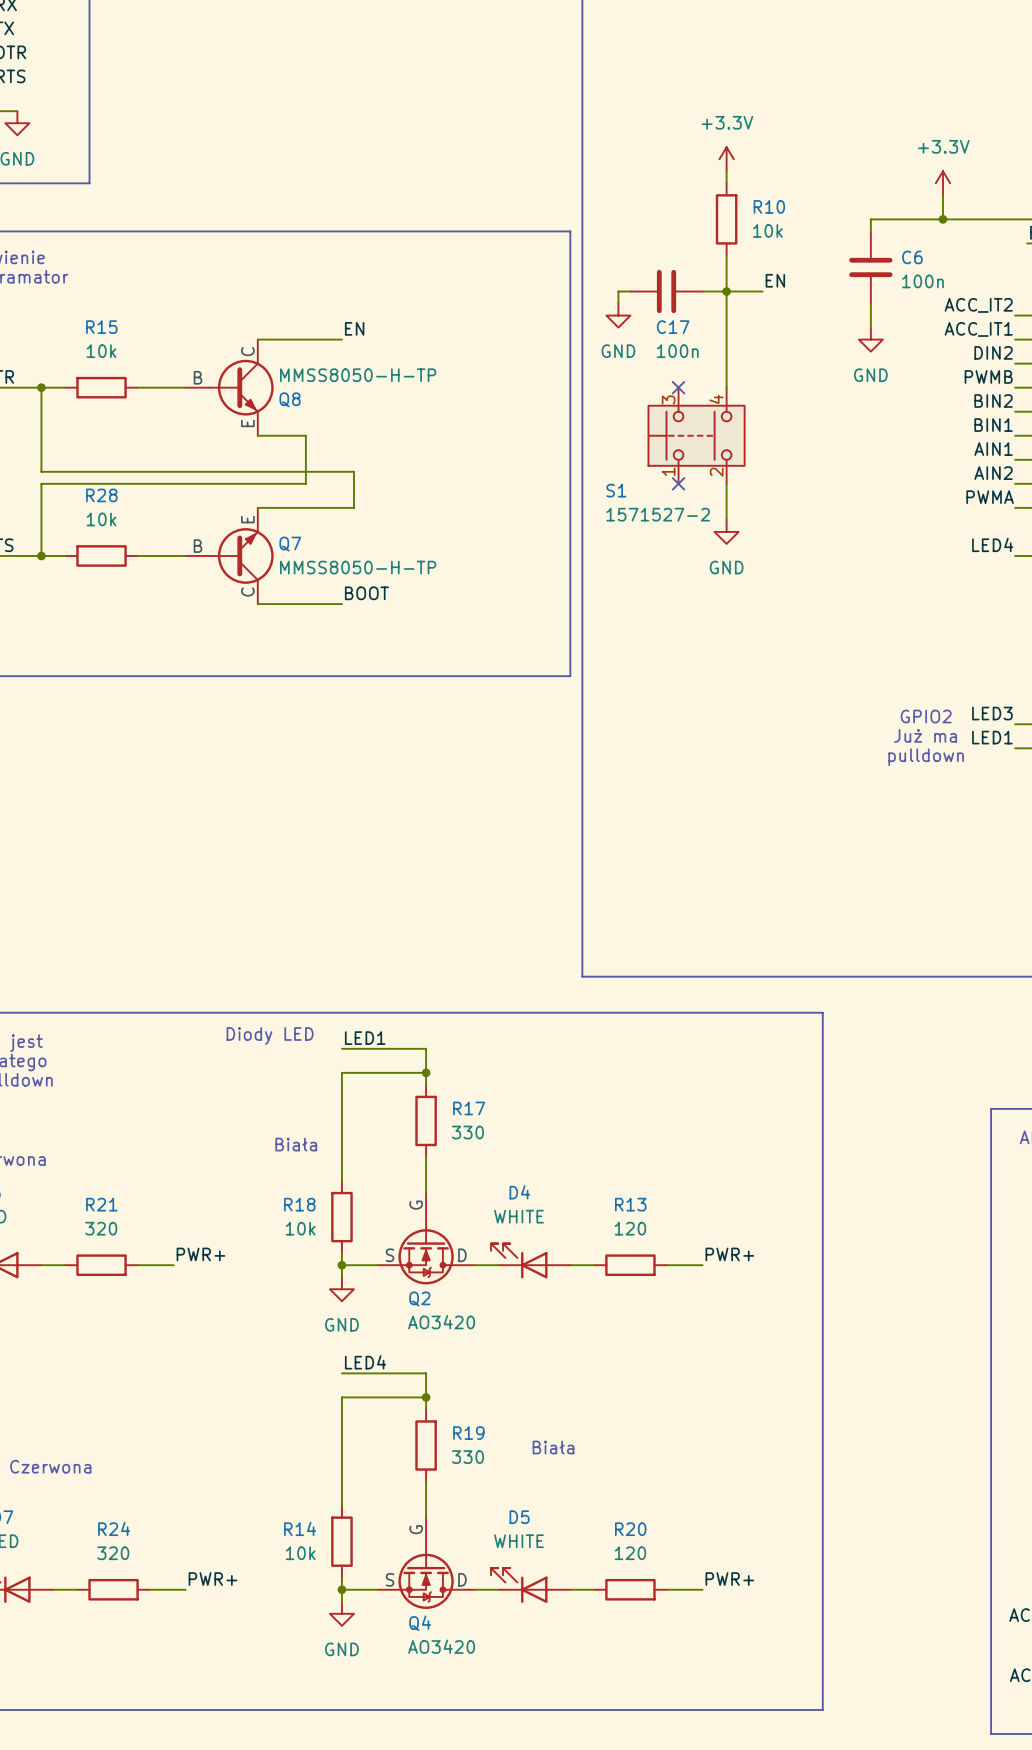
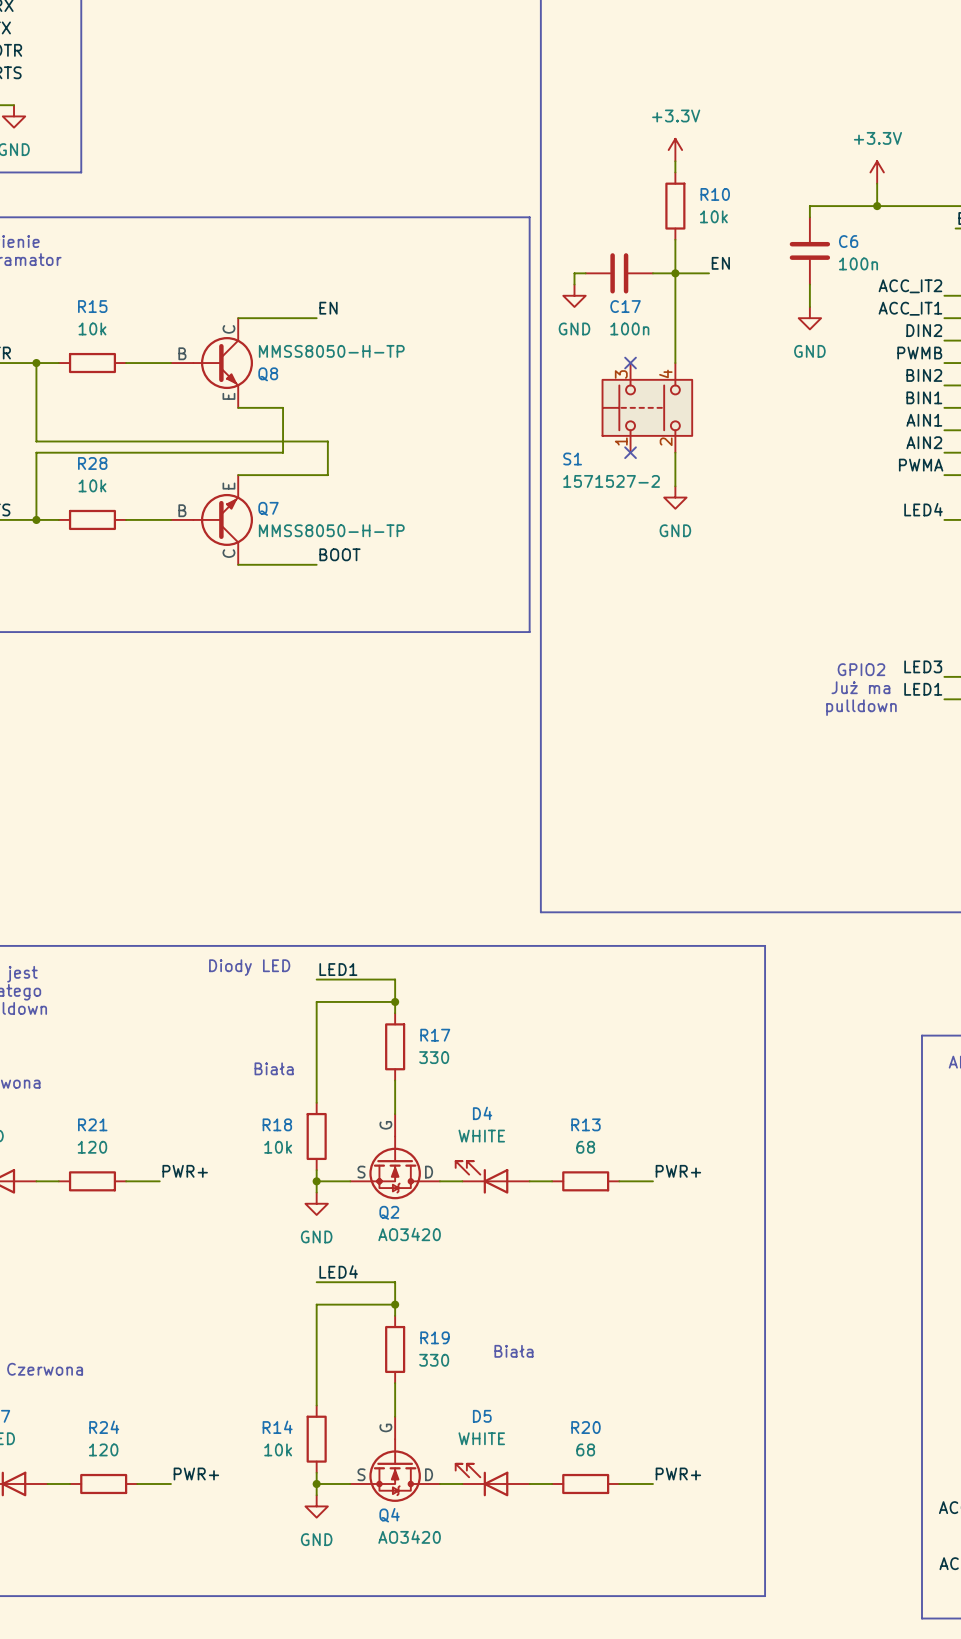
R21 value: 320 (101, 1228) -> 120 (92, 1147)
R13 value: 120 (630, 1228) -> 68 (585, 1147)
R24 value: 320 (113, 1553) -> 120 (103, 1449)
R20 value: 120 (630, 1553) -> 68 (585, 1449)

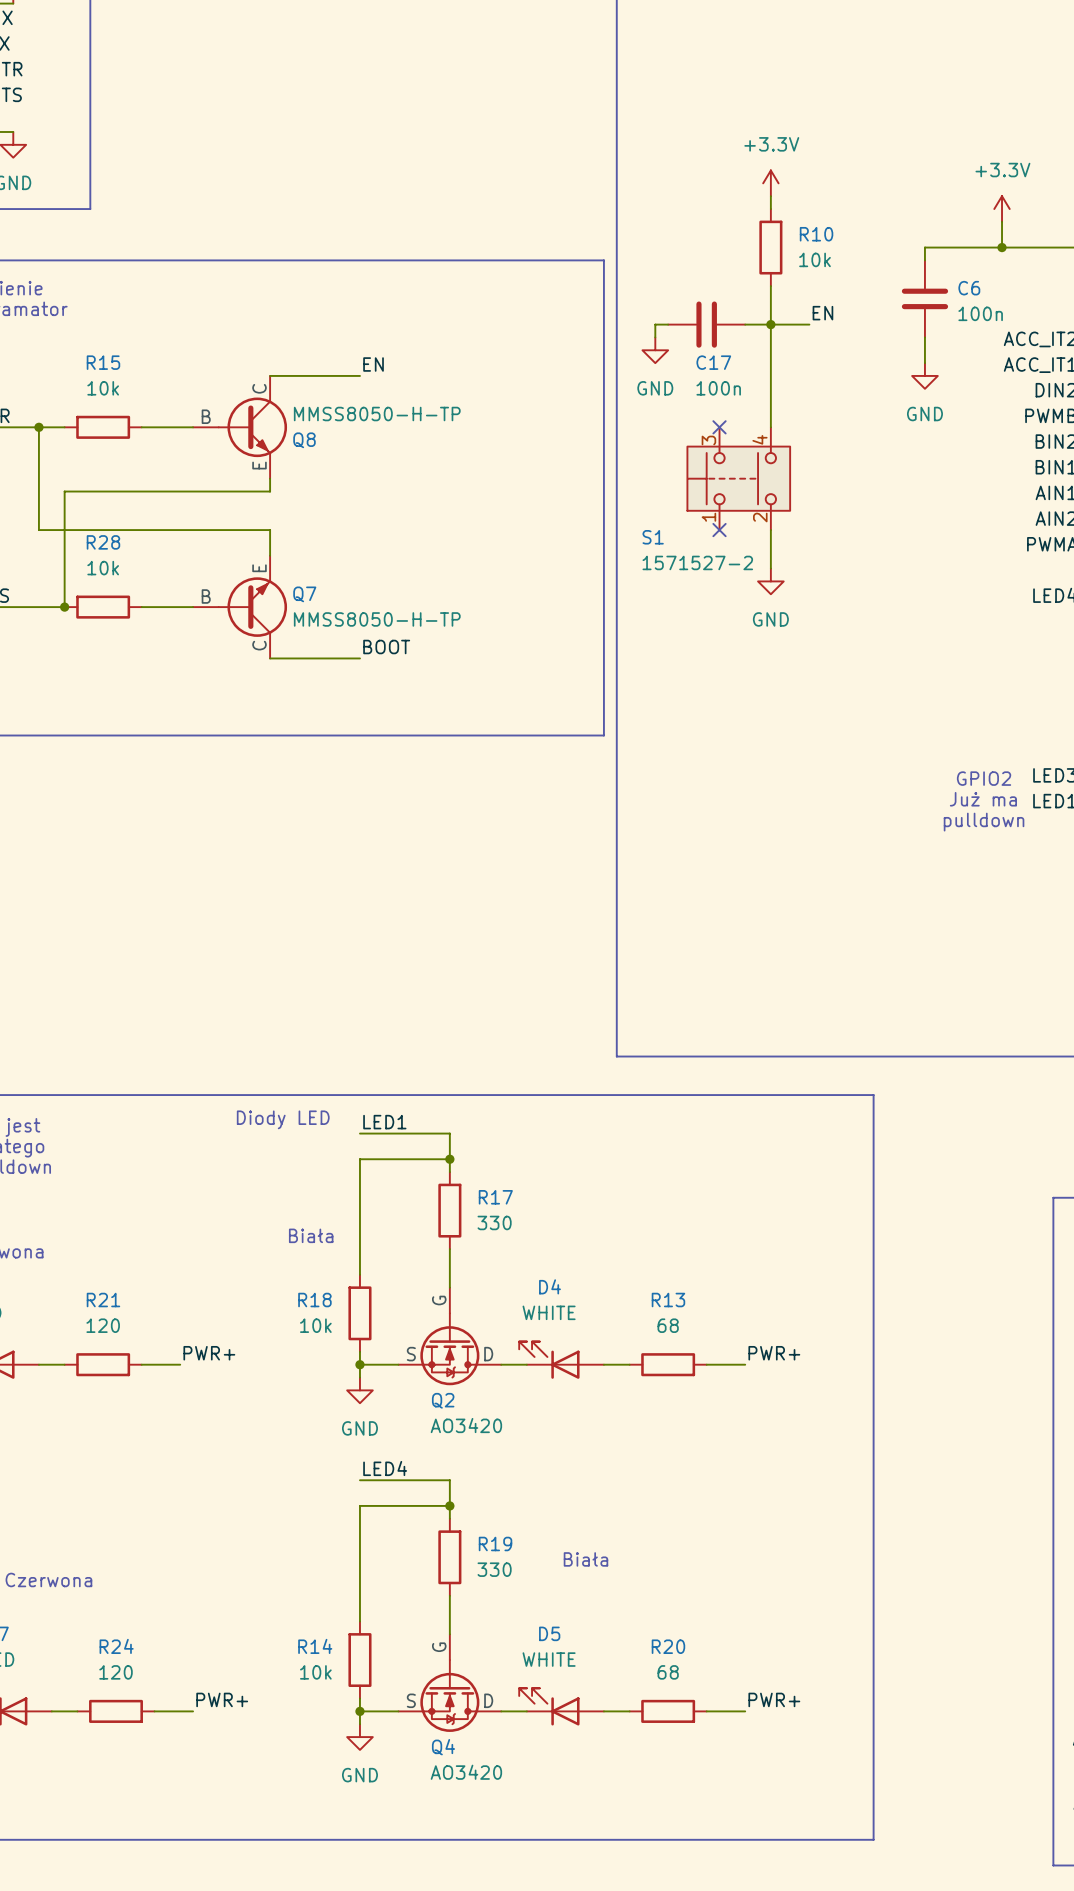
wire: (238, 407) (283, 407) (283, 452) (238, 452) -> (270, 555) (270, 530)
wire: none -> (270, 478) (270, 491) (64, 491) (64, 607)
wire: (36, 441) (327, 441) (327, 475) (238, 475) -> none
wire: (36, 452) (36, 519) -> (38, 530) (38, 517)
junction position: (36, 519) -> (64, 607)

